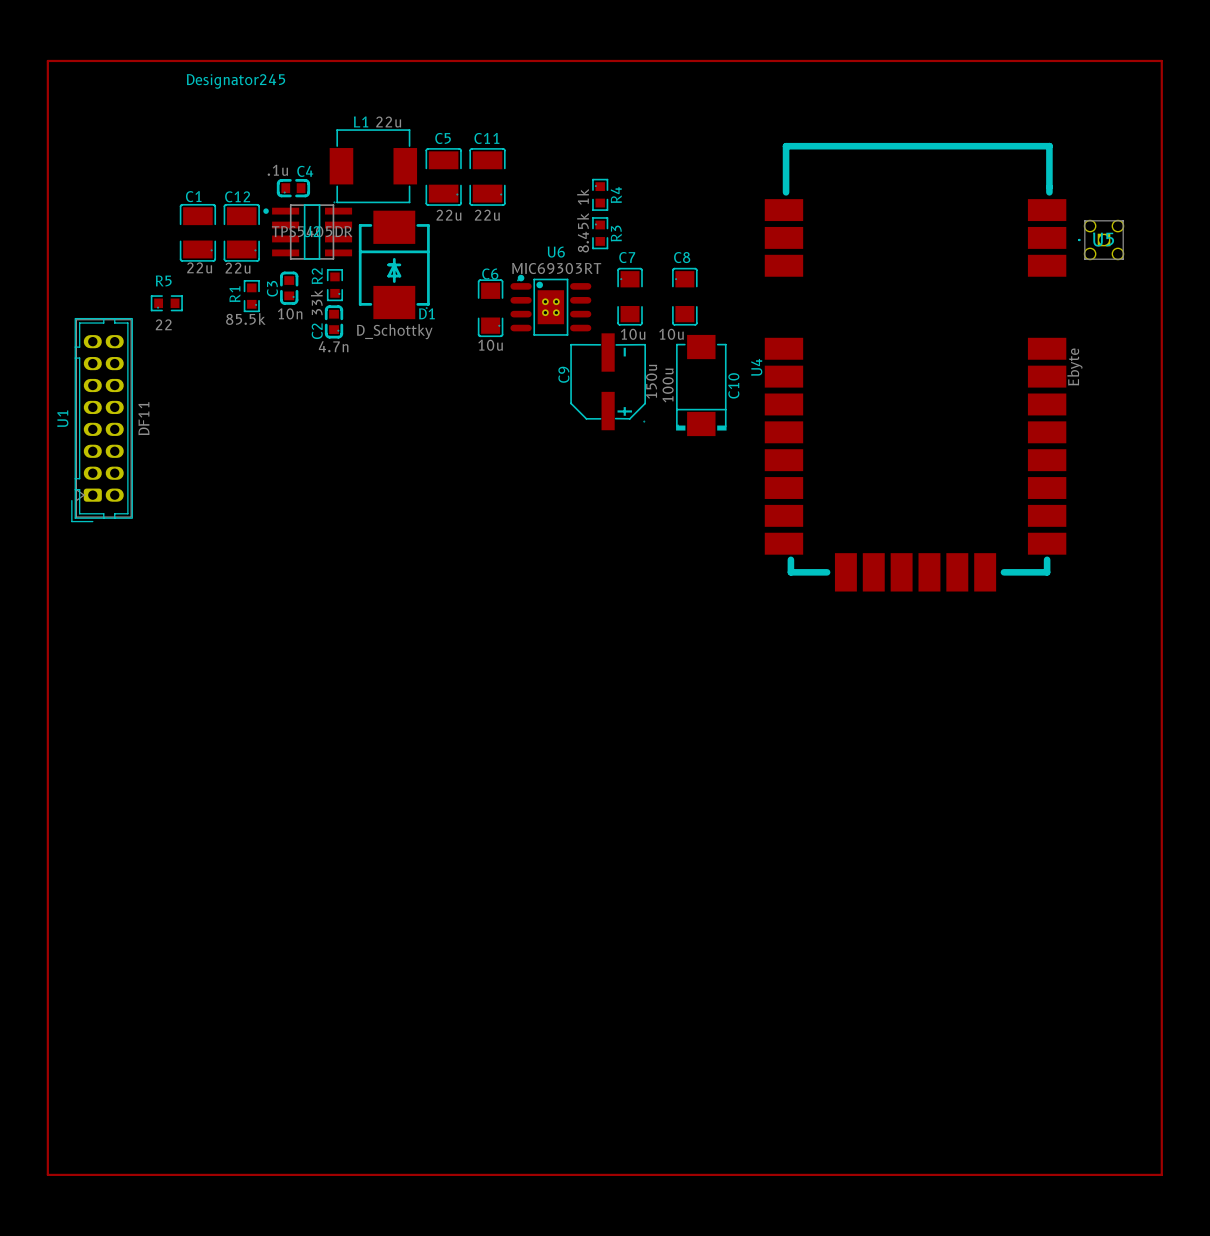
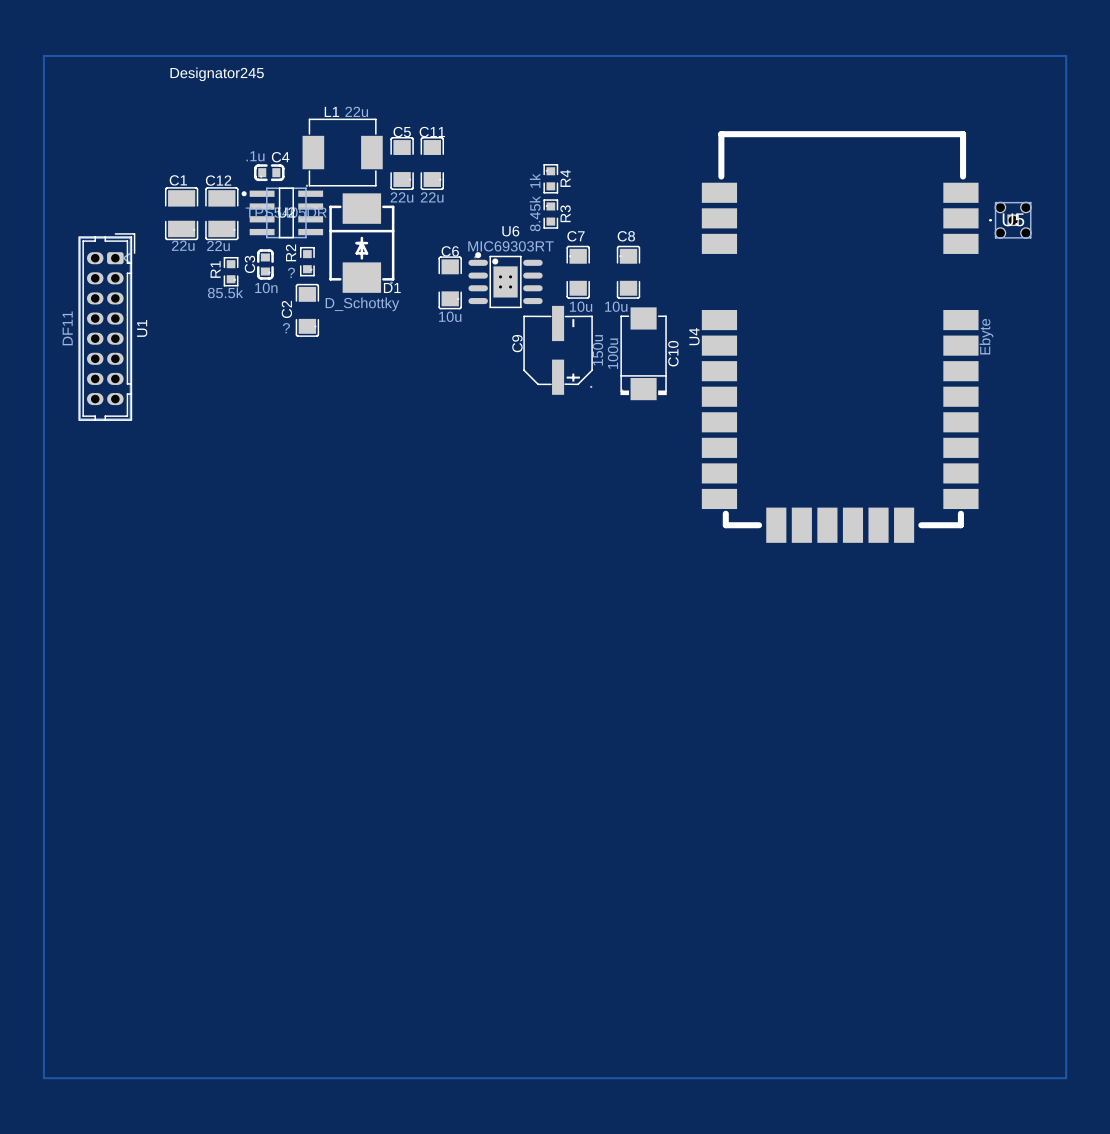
C5 footprint: [425, 148, 462, 206] -> [390, 137, 414, 191]
C11 footprint: [469, 148, 506, 206] -> [420, 137, 445, 191]
R2 value: 33k (316, 302) -> ? (291, 272)
R5: 22 (166, 303) -> none
C2 footprint: [324, 305, 344, 339] -> [295, 283, 320, 337]
C2 value: 4.7n (333, 346) -> ? (286, 328)
U1 rotation: 0° (102, 420) -> 180° (106, 327)

